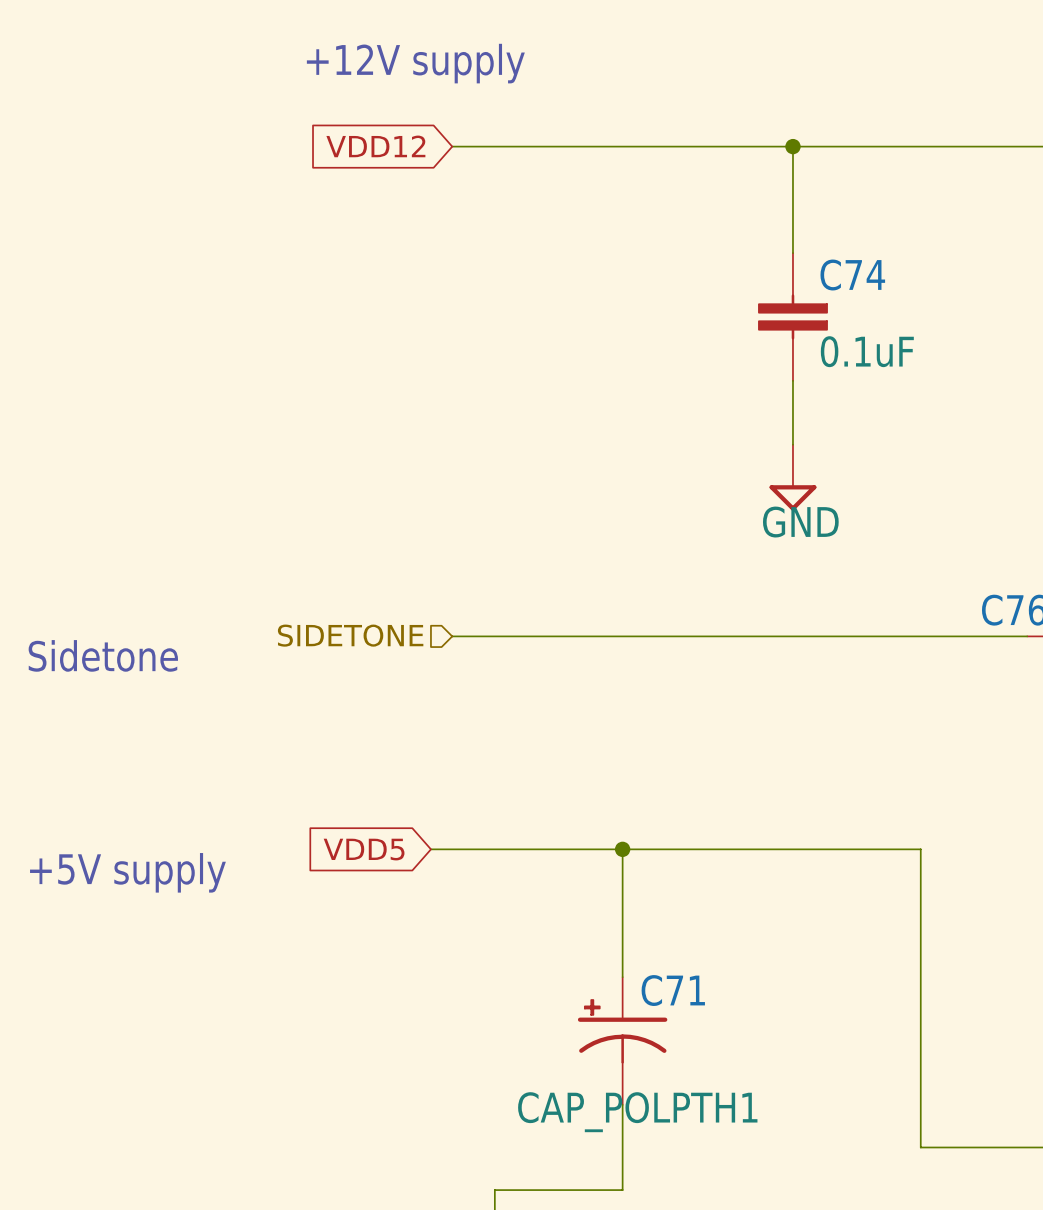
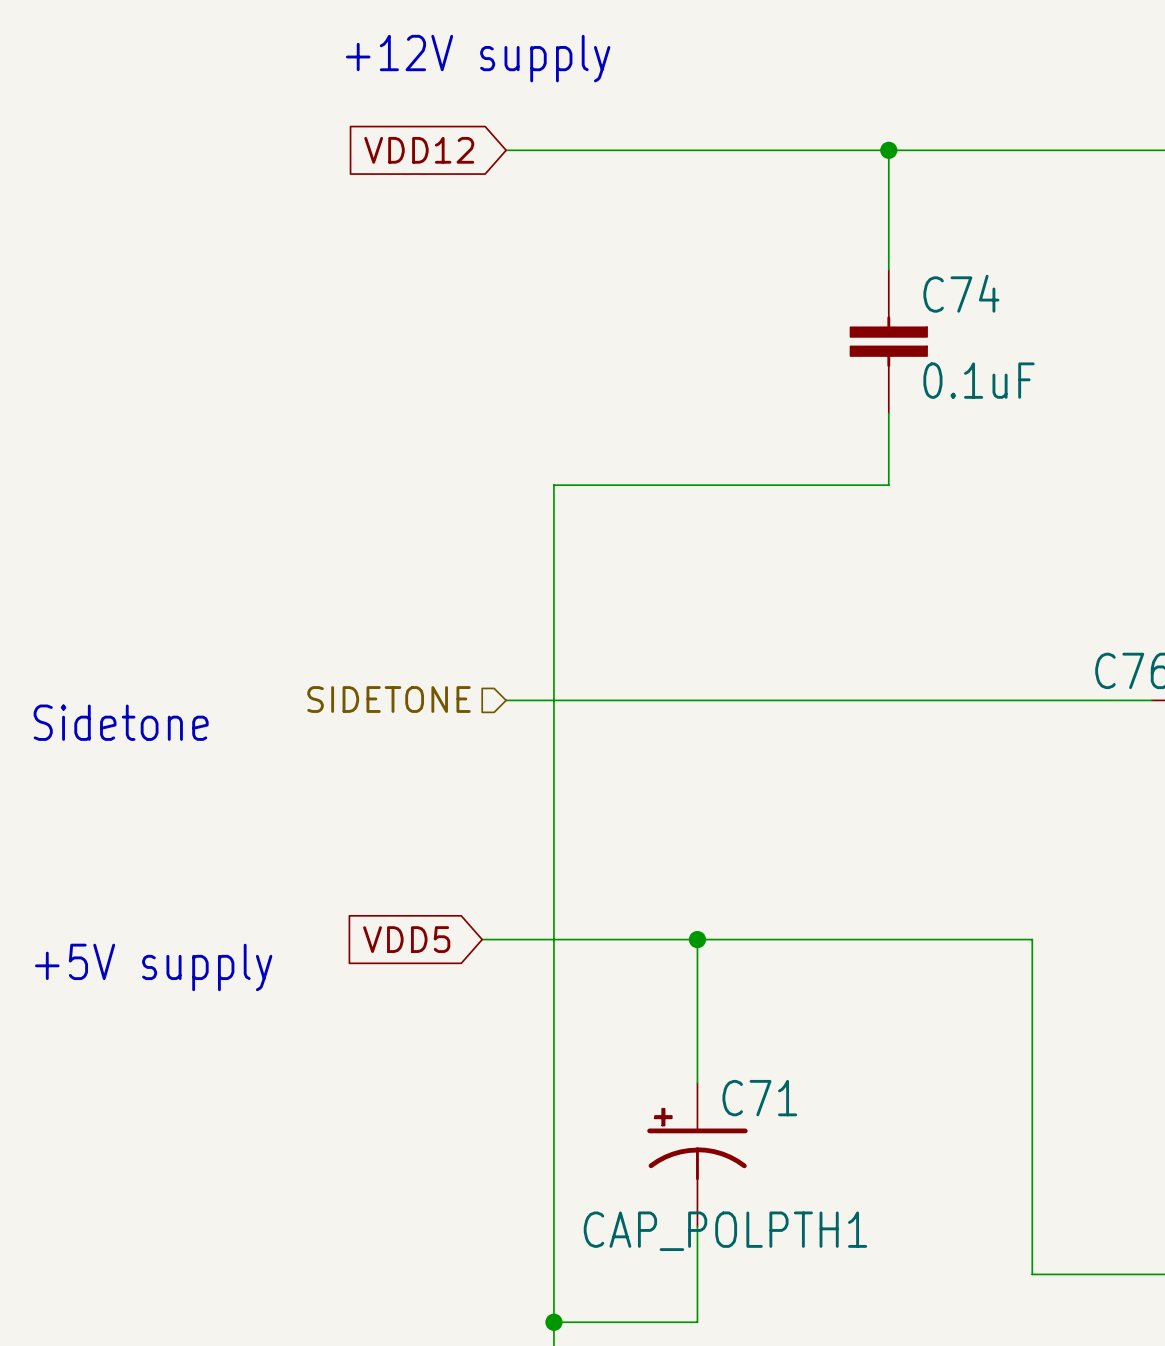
wire: none -> (888, 485) (553, 485) (553, 1322)
power symbol: GND (792, 477) -> none
junction: none -> (553, 1322)

